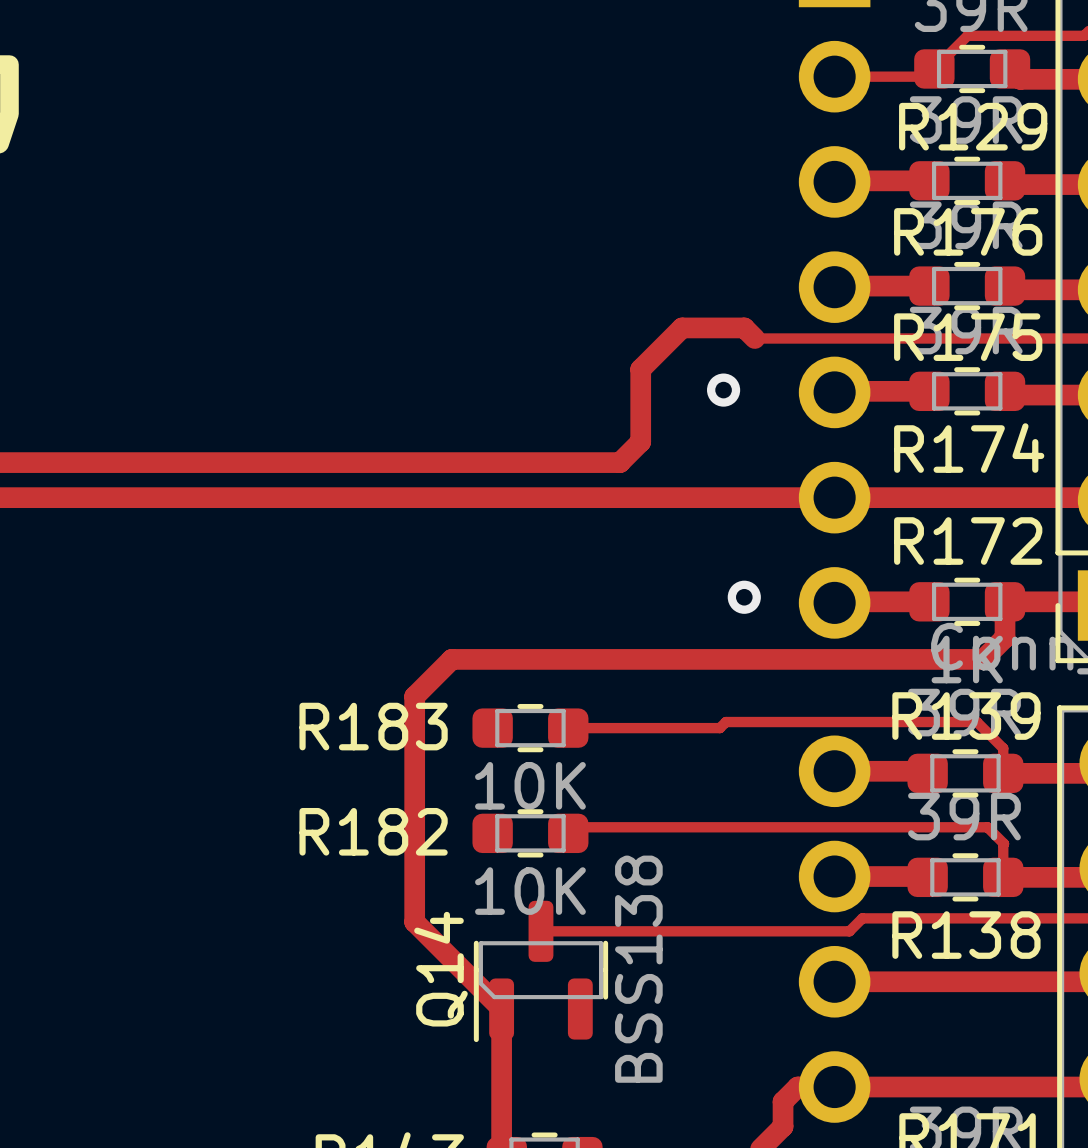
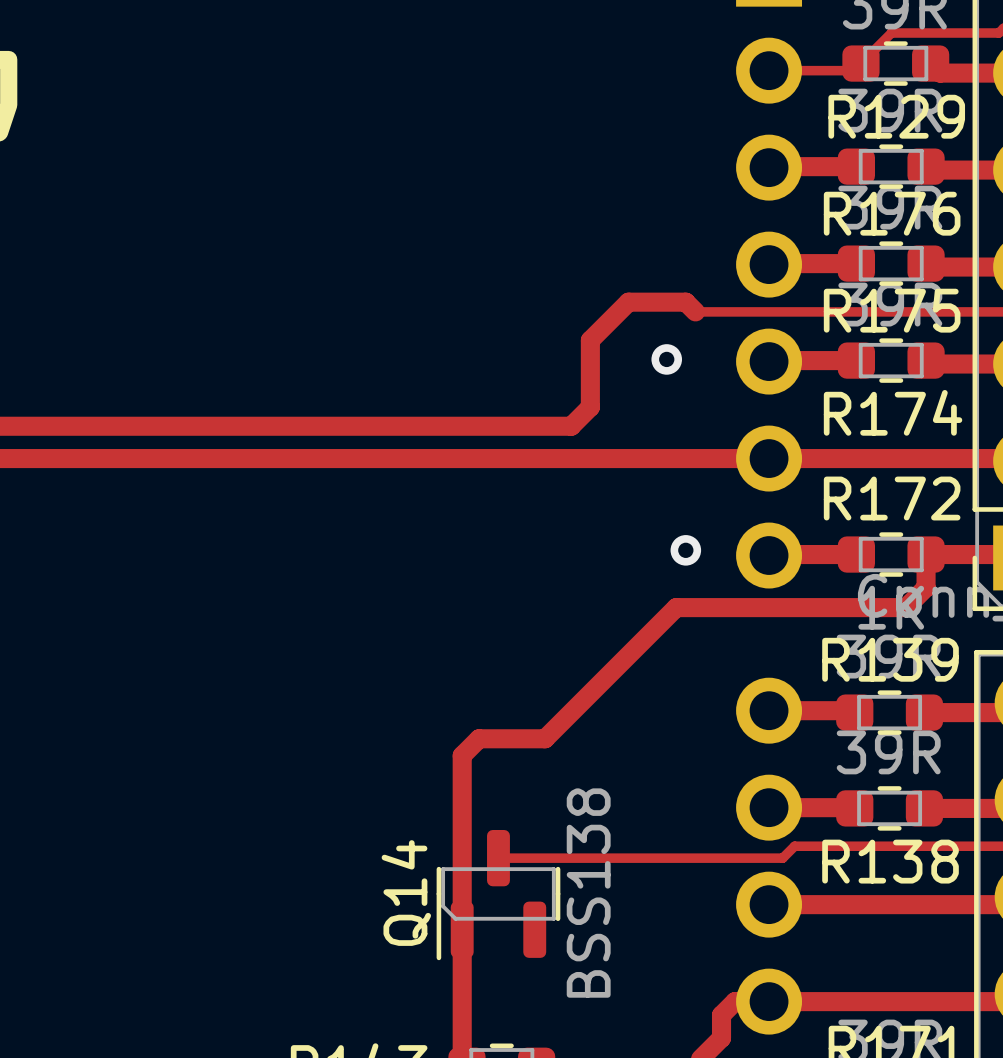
top track: (733, 659) (451, 659) (414, 696) (414, 922) (501, 1009) -> (676, 607) (545, 738) (479, 738) (462, 755) (462, 929)
R183: 10K (530, 728) -> none
top track: (568, 728) (719, 728) (725, 722) (976, 722) (1003, 748) (1003, 773) -> none
R182: 10K (530, 833) -> none
top track: (568, 833) (574, 827) (987, 827) (1004, 843) (1003, 877) -> none

